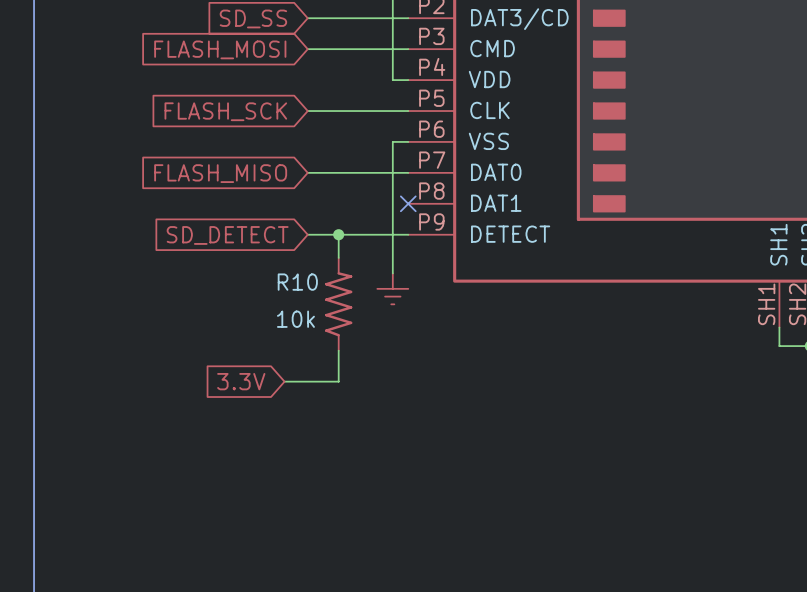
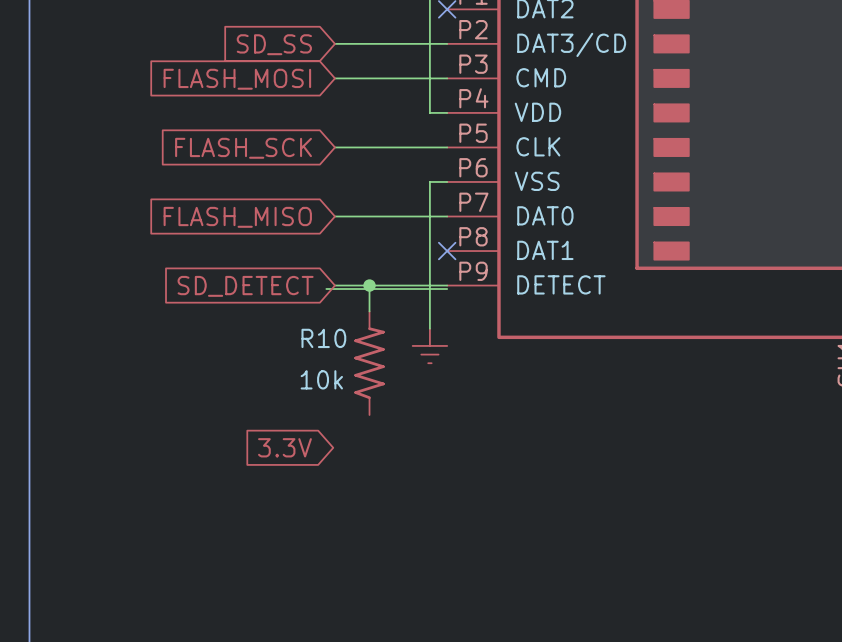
wire: none -> (326, 288) (447, 288)
wire: (338, 350) (338, 381) (284, 381) -> none
global label position: 3.3V (241, 381) -> 3.3V (284, 447)

